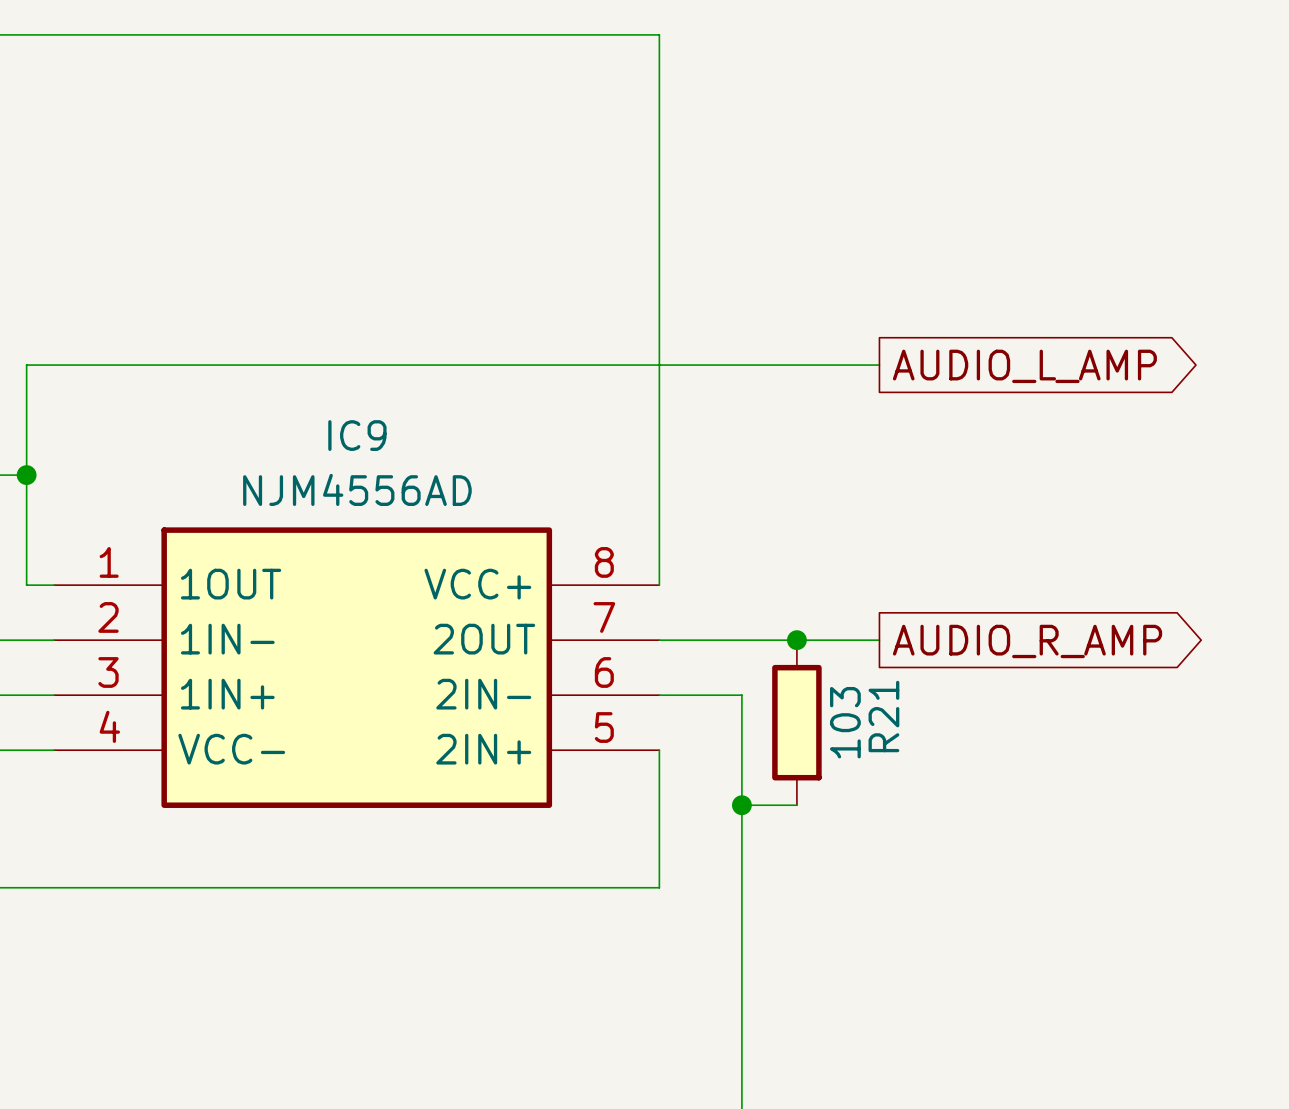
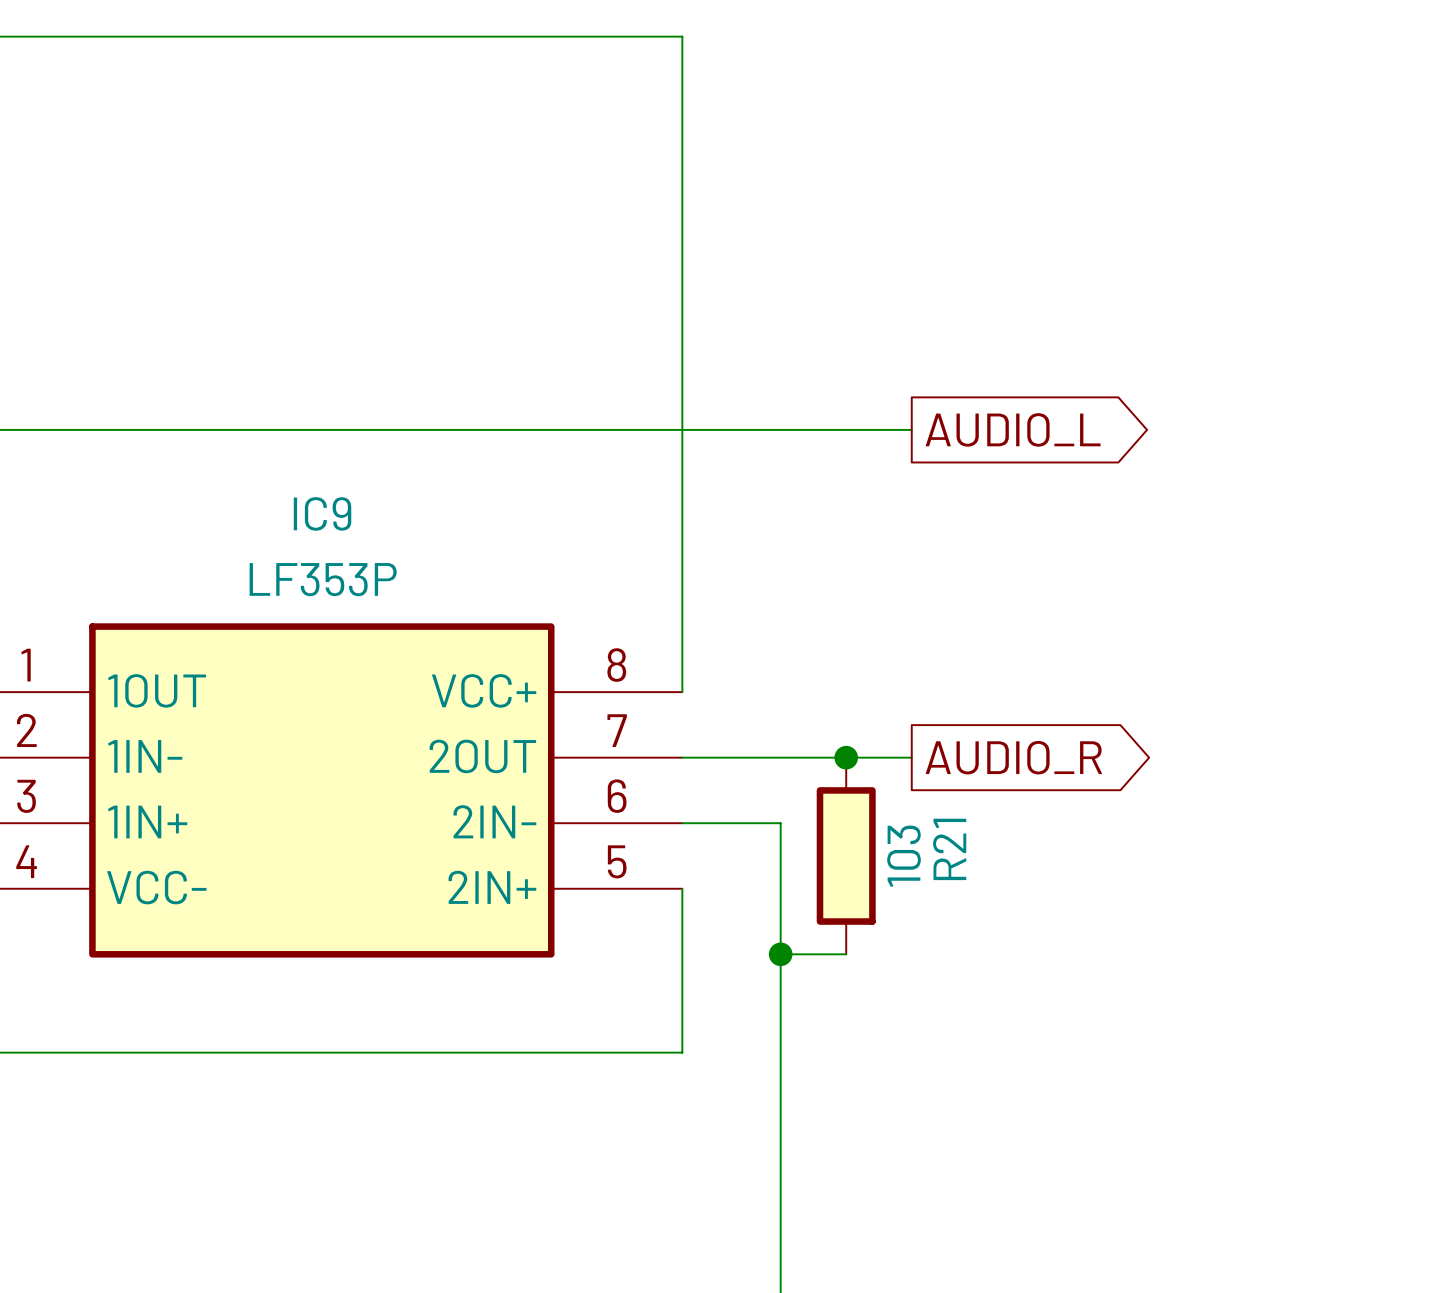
wire: (851, 365) (879, 365) -> none
global label: AUDIO_L_AMP (1024, 366) -> AUDIO_L (1013, 429)
IC9 value: NJM4556AD (357, 489) -> LF353P (323, 579)
wire: (851, 640) (879, 640) -> none
global label: AUDIO_R_AMP (1027, 641) -> AUDIO_R (1013, 757)

